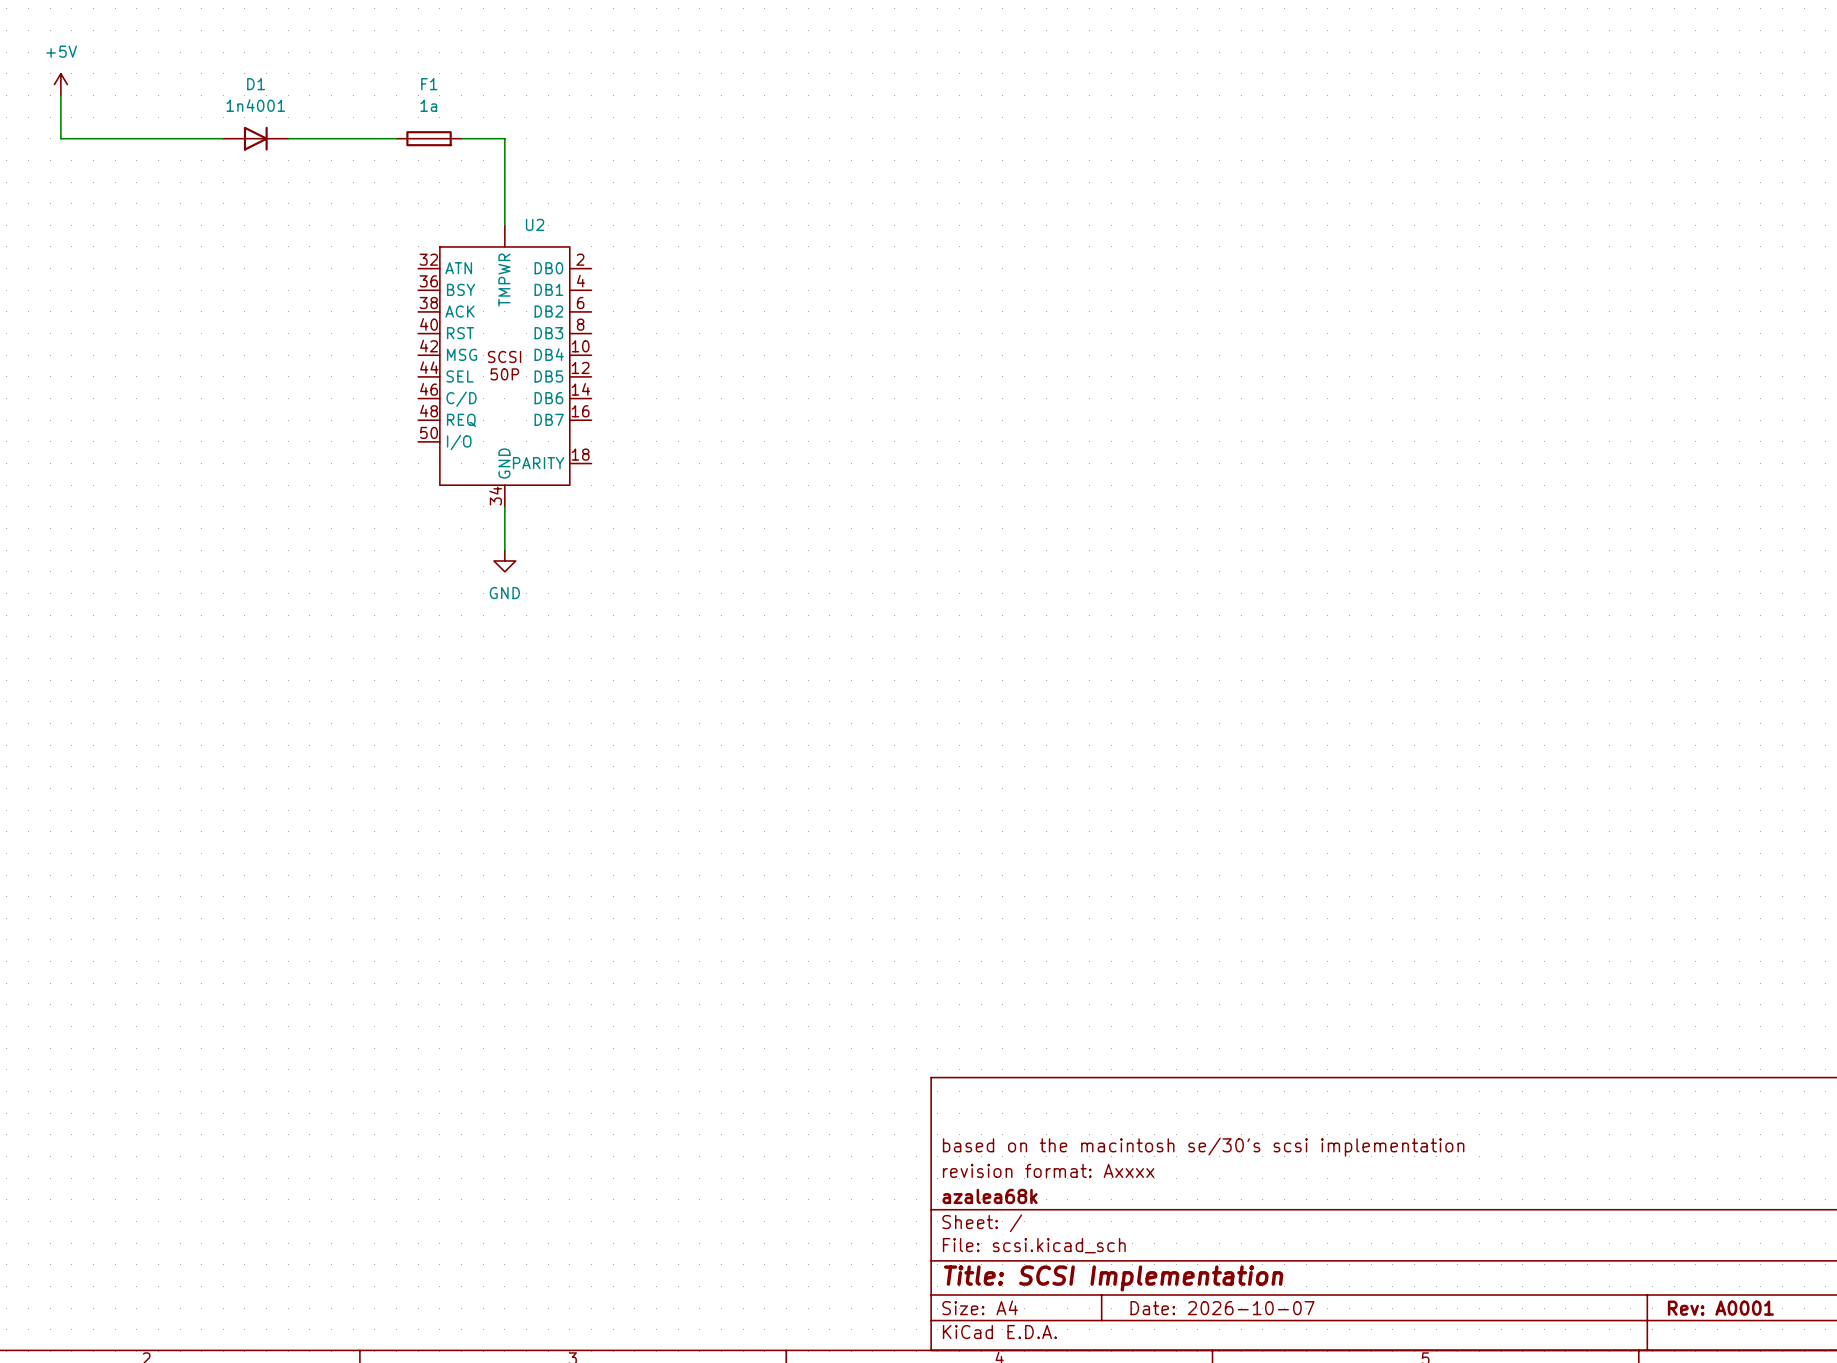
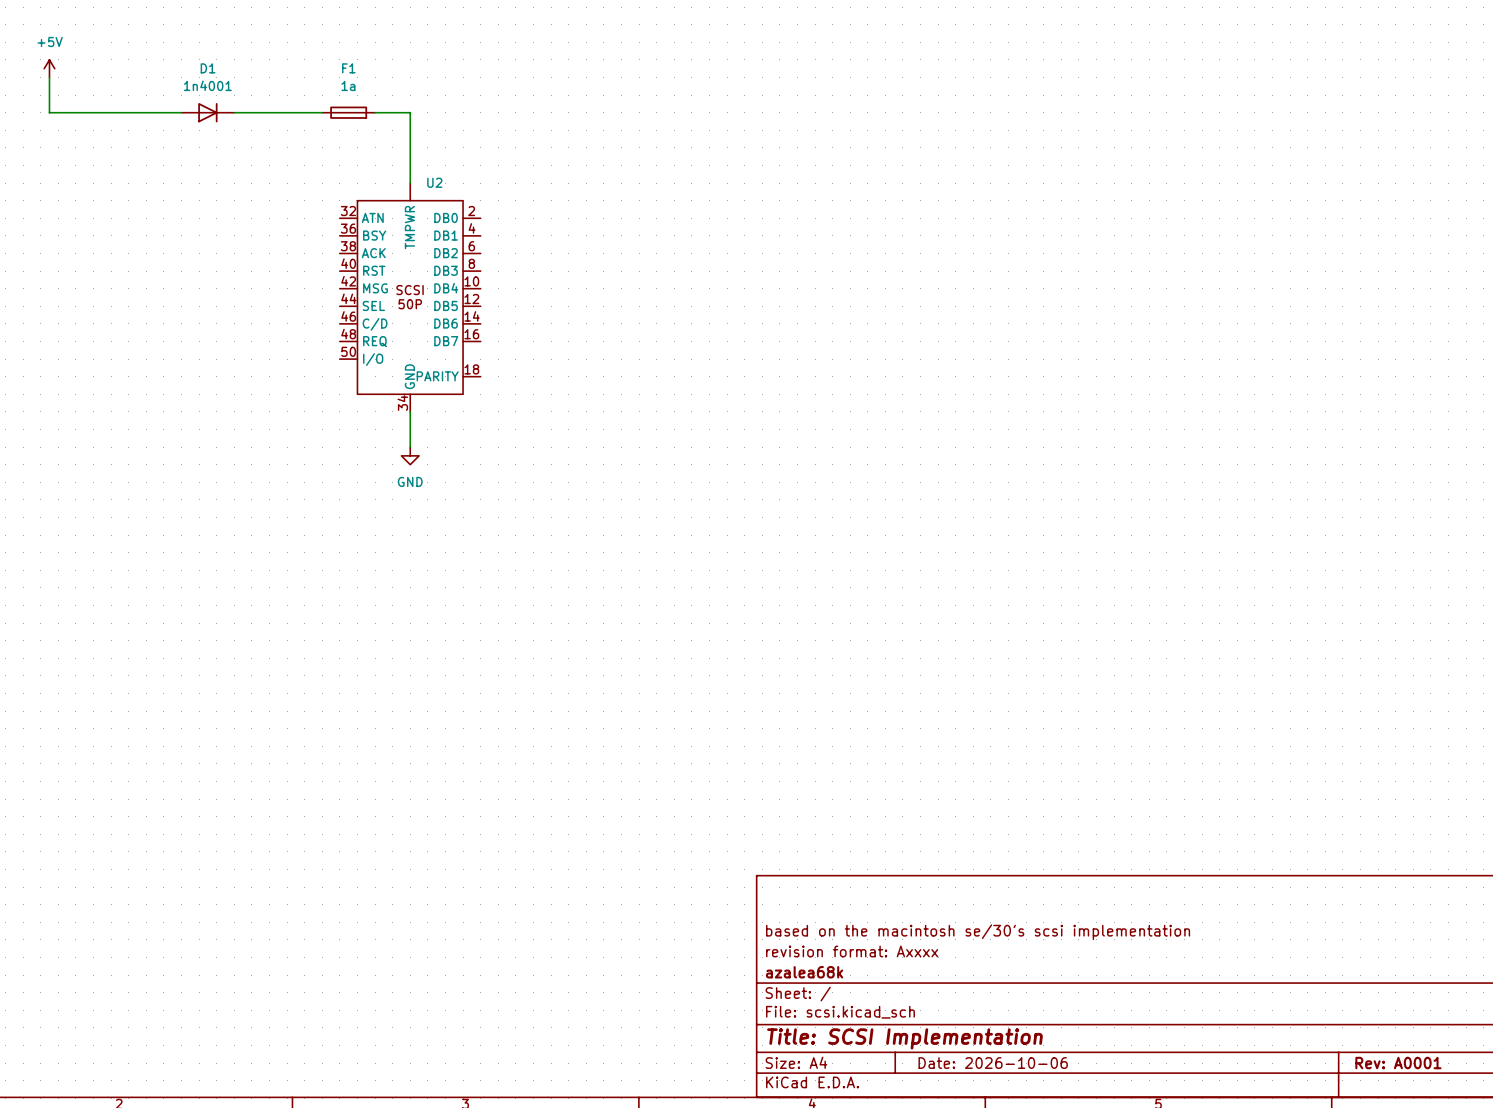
title block: Date: 2026-10-07 (1222, 1308) -> Date: 2026-10-06 (993, 1063)

